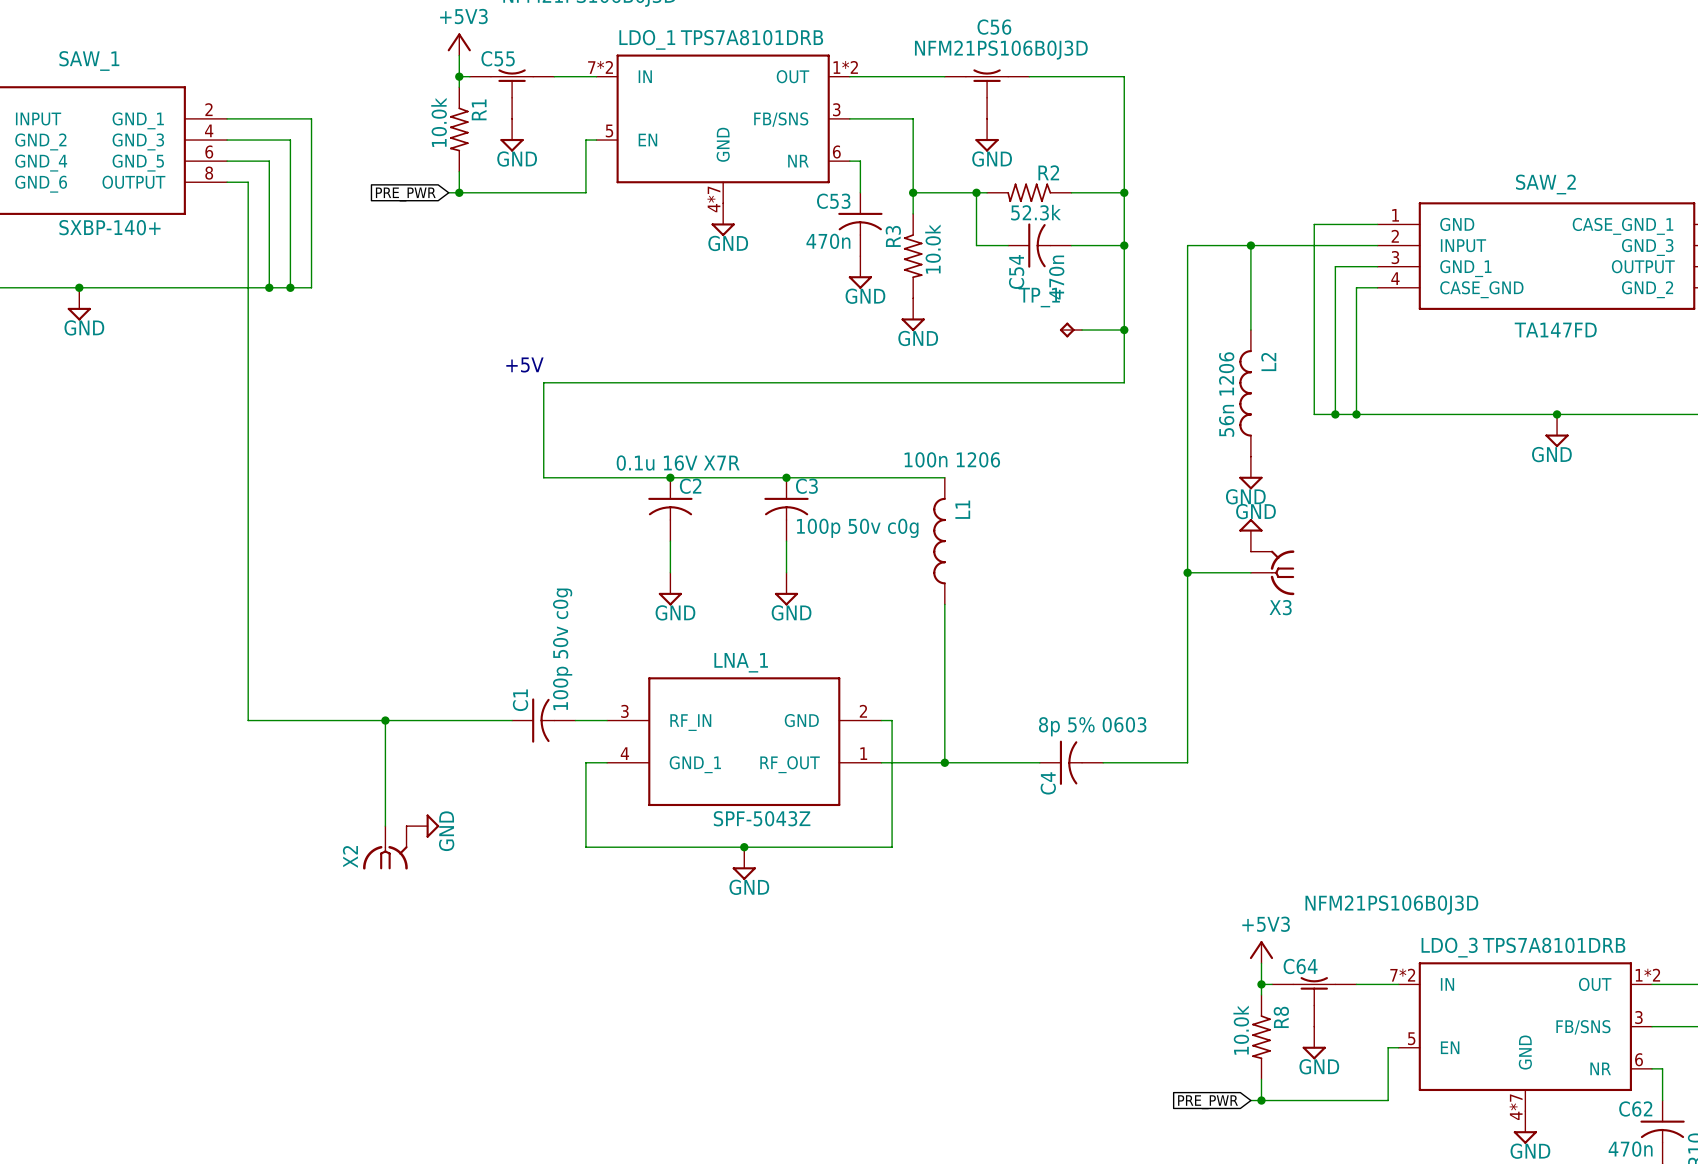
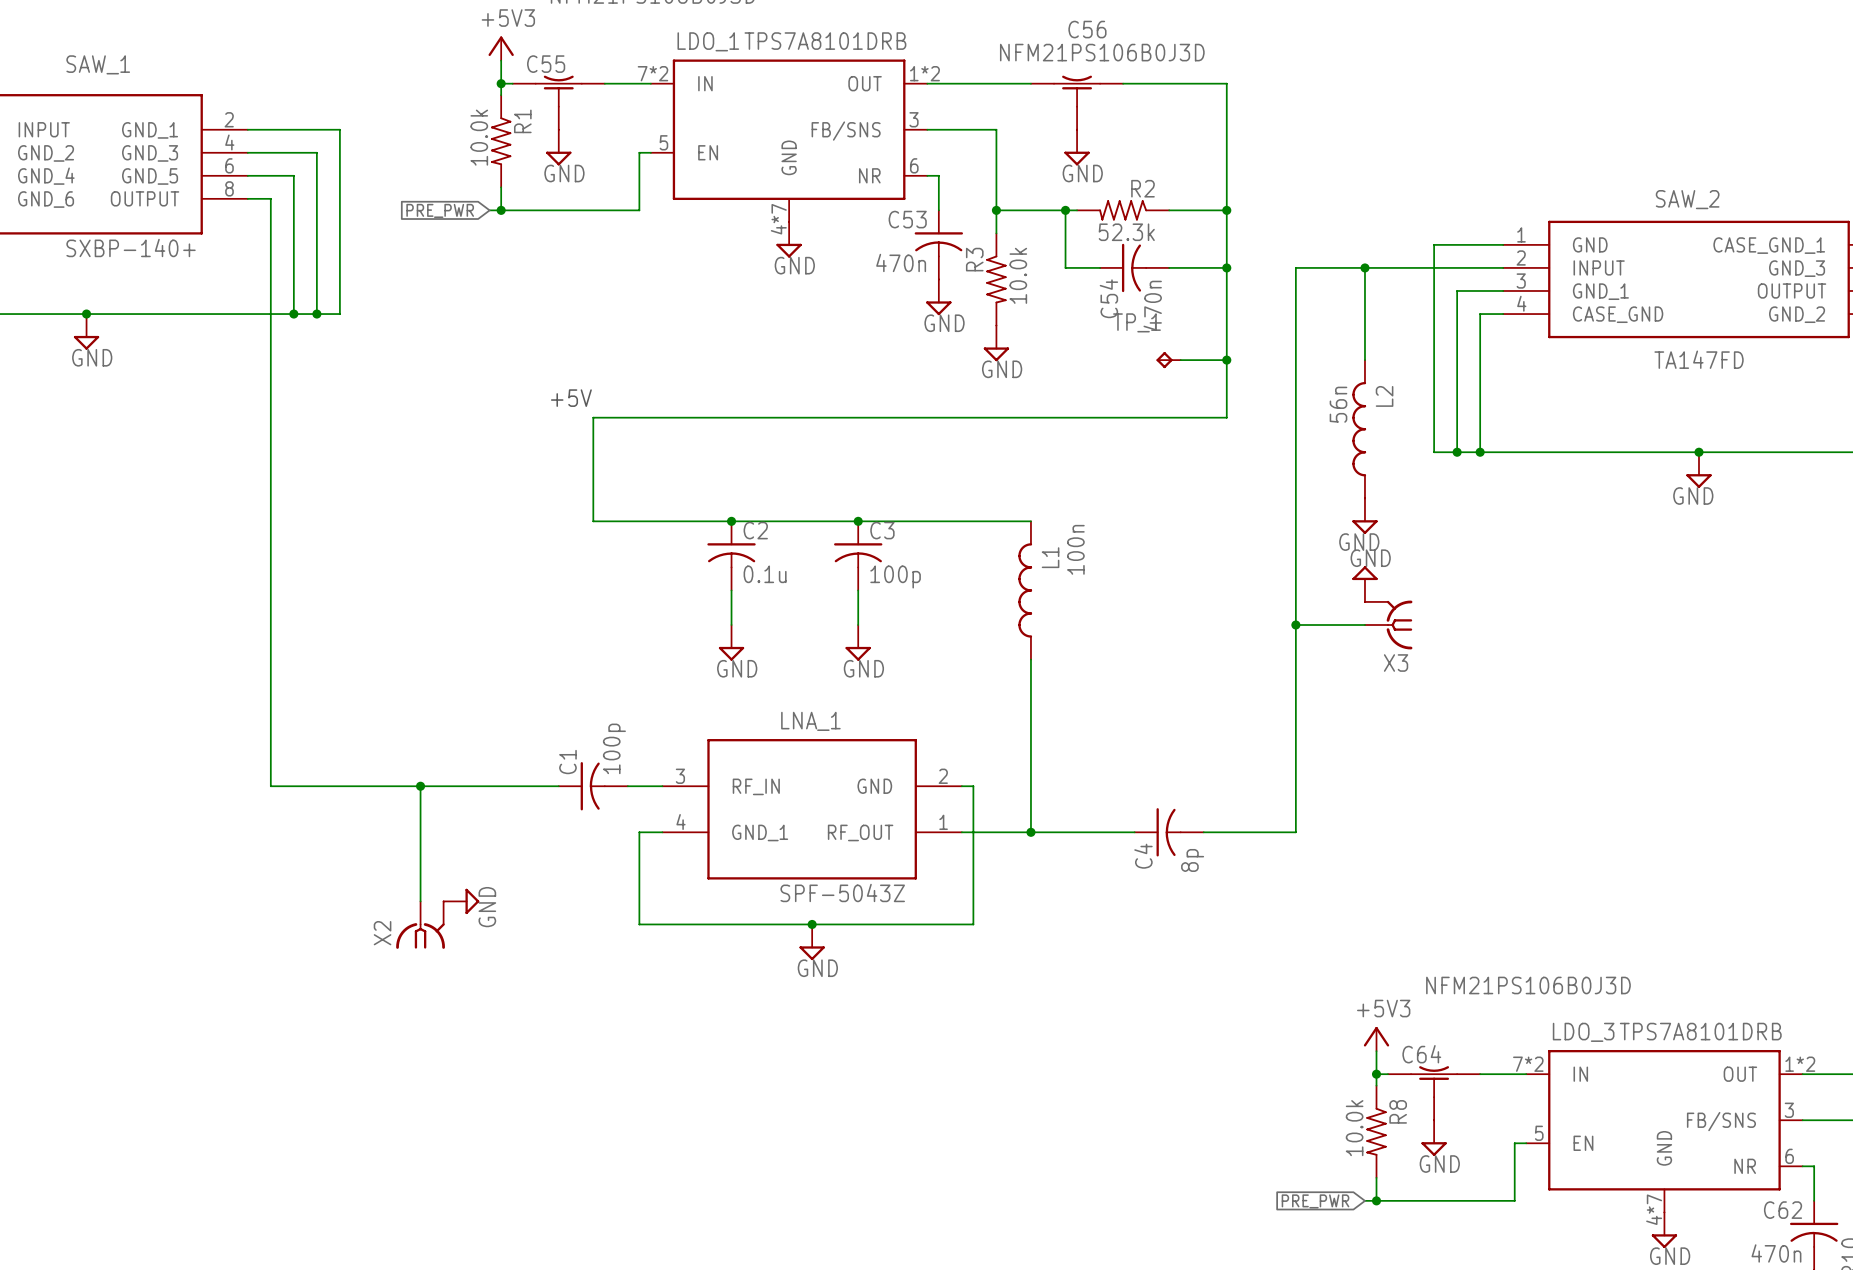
L2 value: 56n 1206 (1226, 394) -> 56n (1338, 404)
L1 value: 100n 1206 (952, 459) -> 100n (1075, 549)
C2 value: 0.1u 16V X7R (678, 463) -> 0.1u (765, 574)
C3 value: 100p 50v c0g (857, 528) -> 100p (895, 577)
C1 value: 100p 50v c0g (562, 649) -> 100p (614, 748)
C4 value: 8p 5% 0603 (1092, 726) -> 8p (1192, 860)

